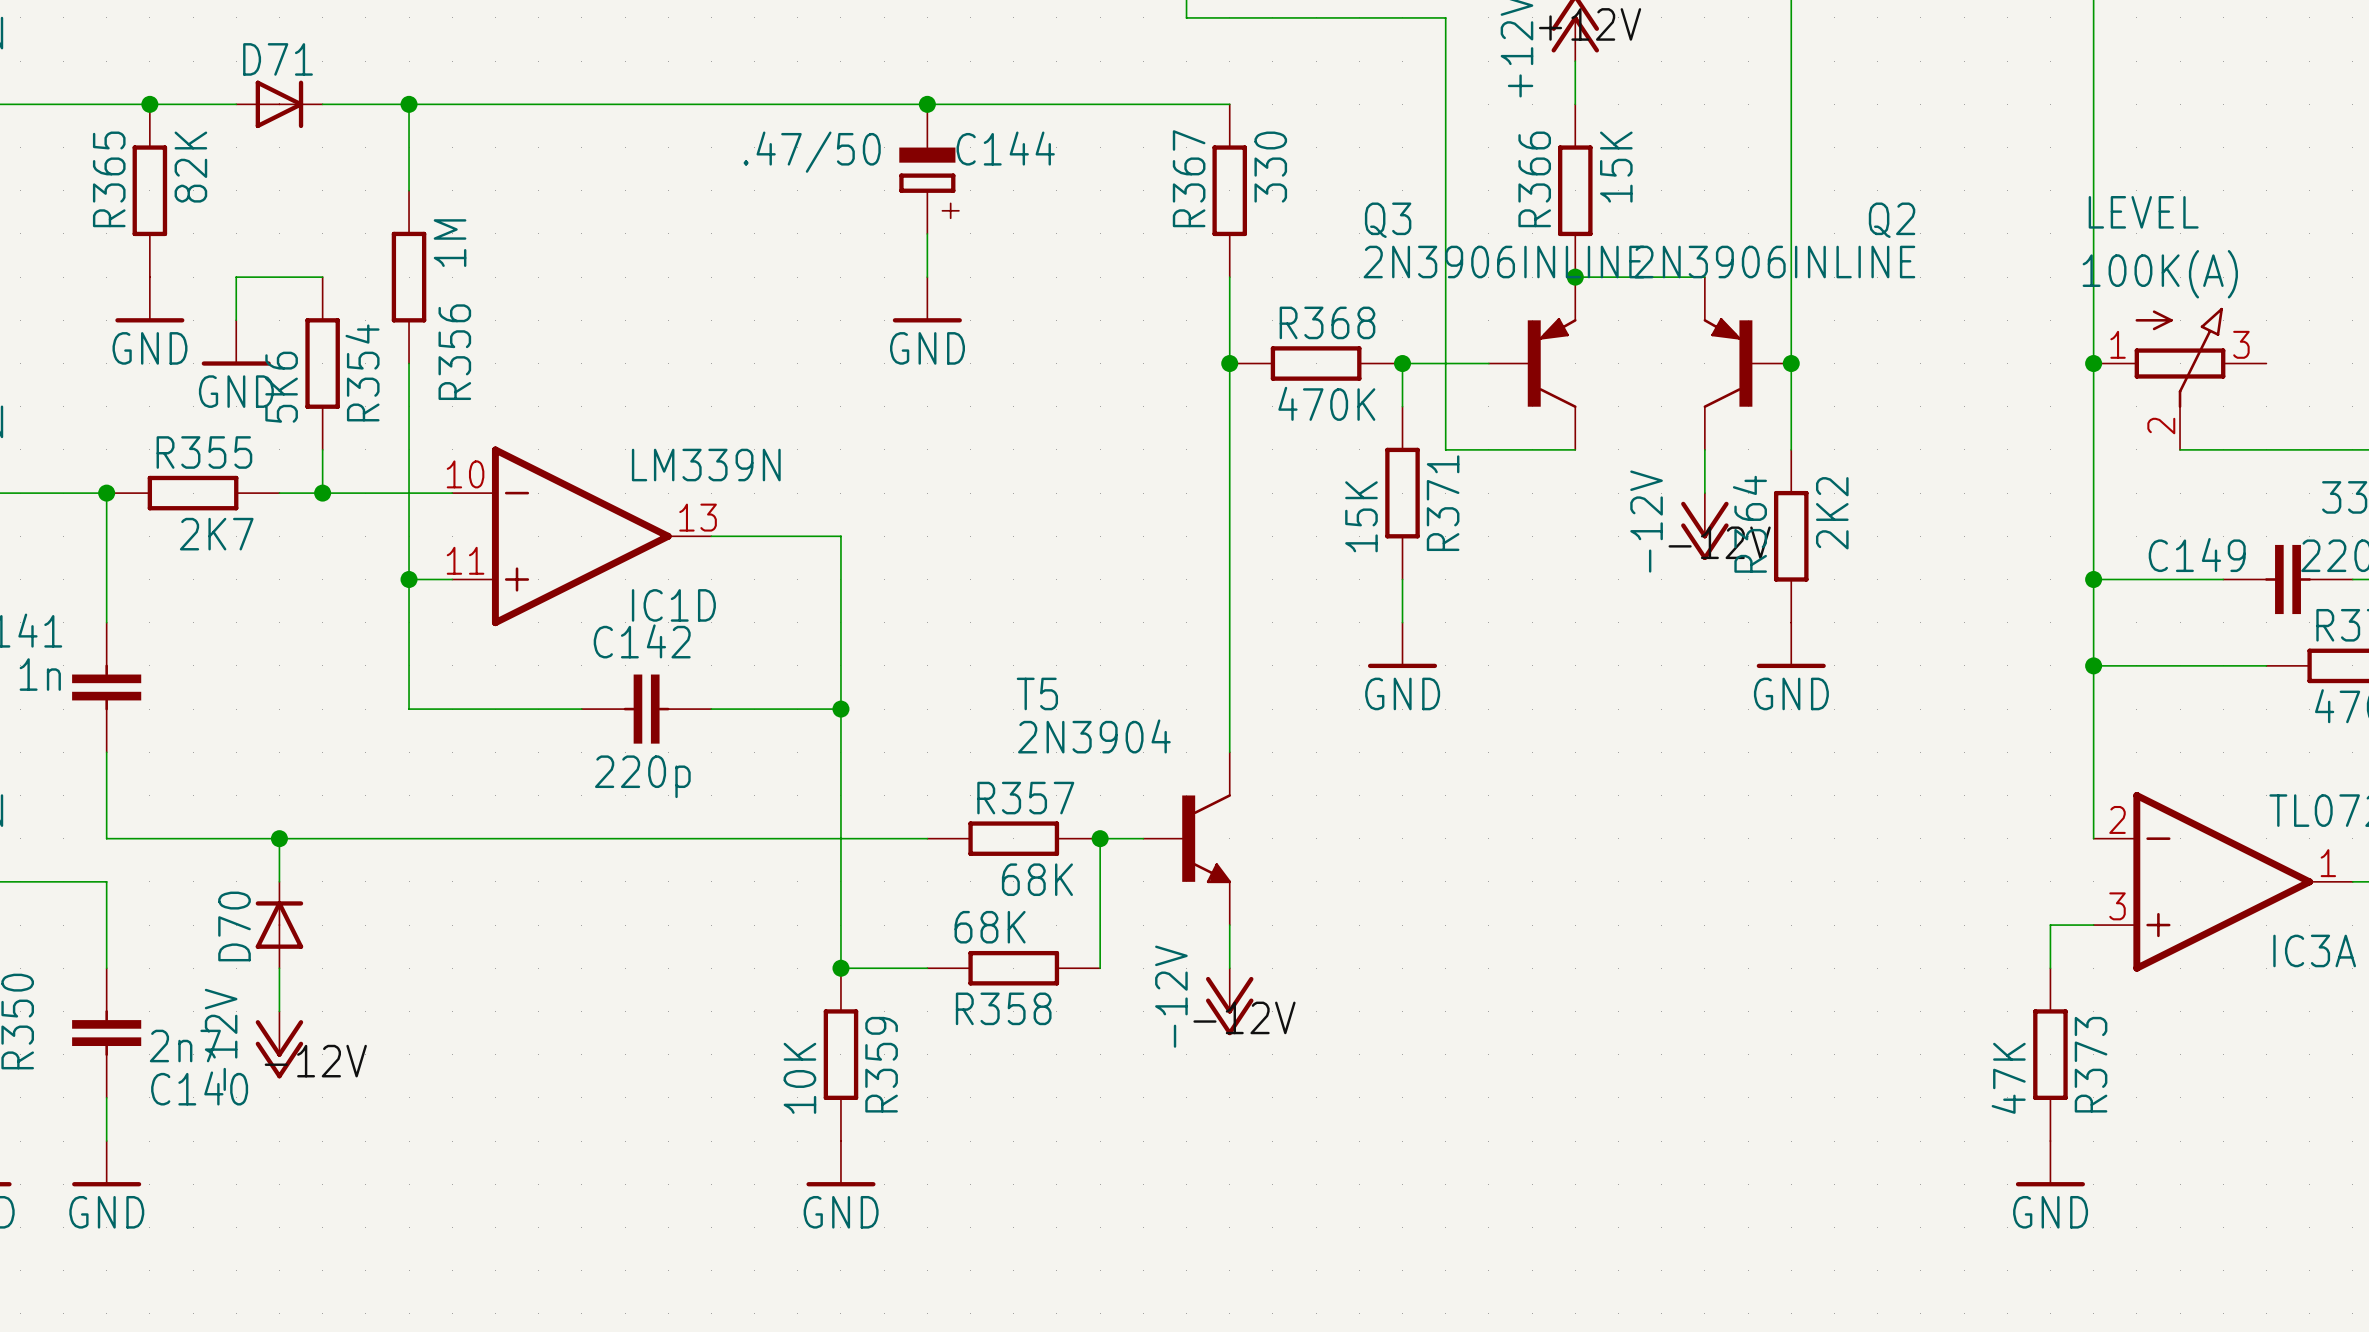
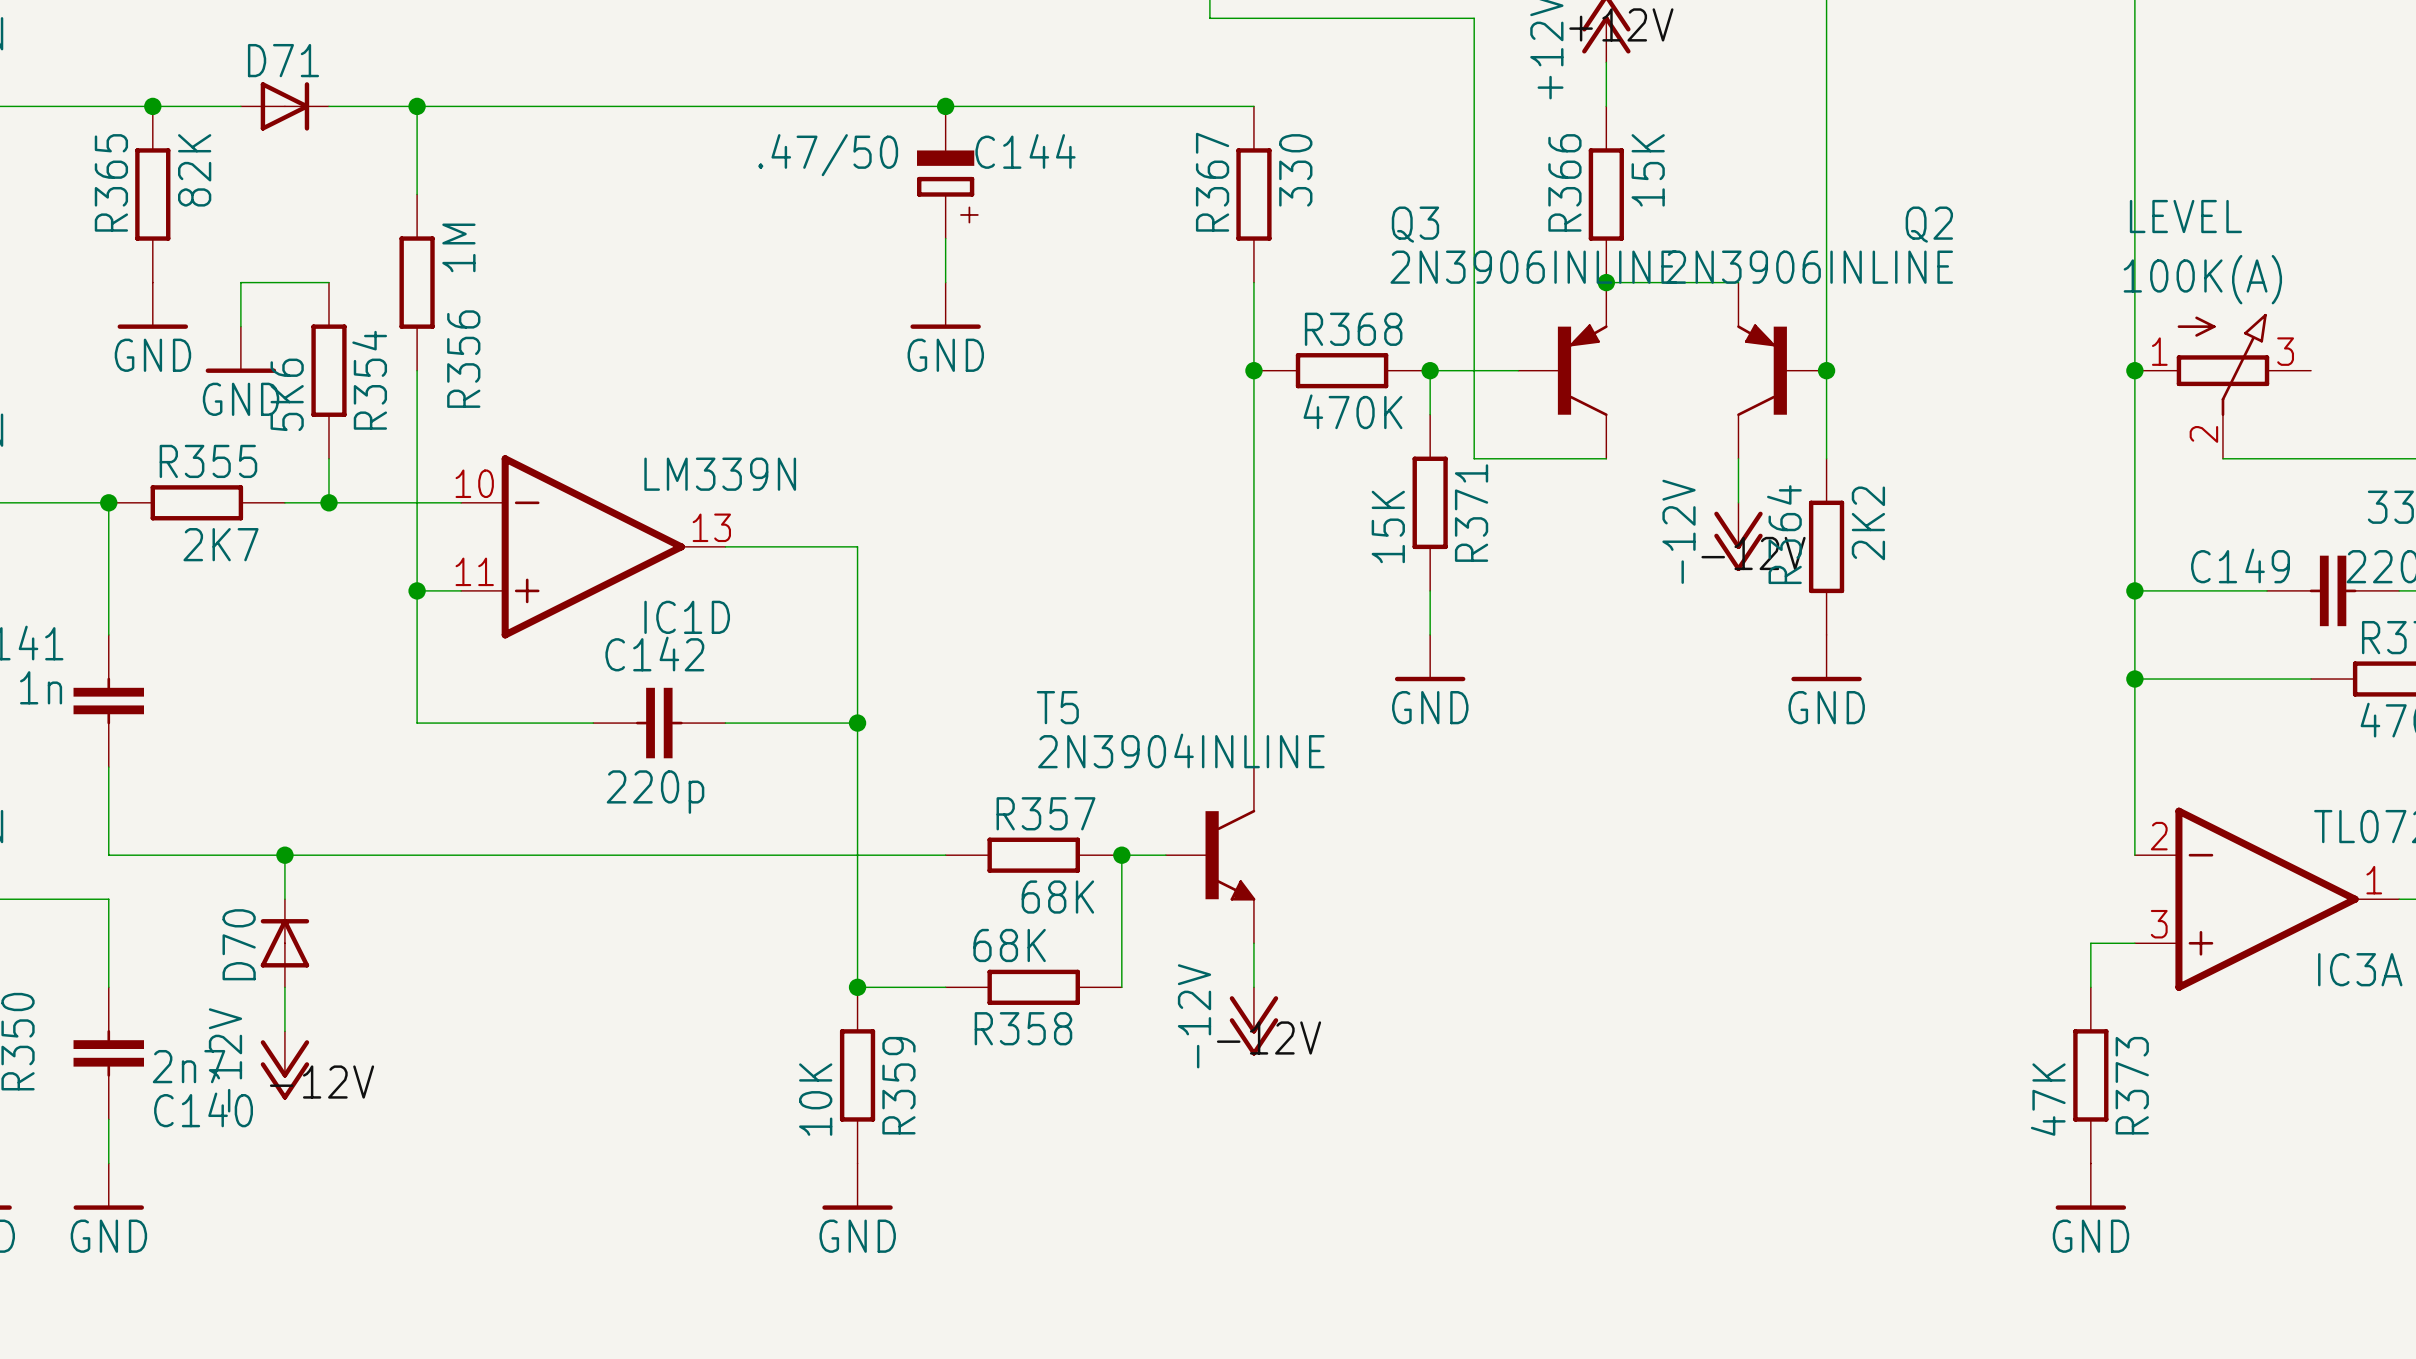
T5 value: 2N3904 (1094, 736) -> 2N3904INLINE (1181, 750)

